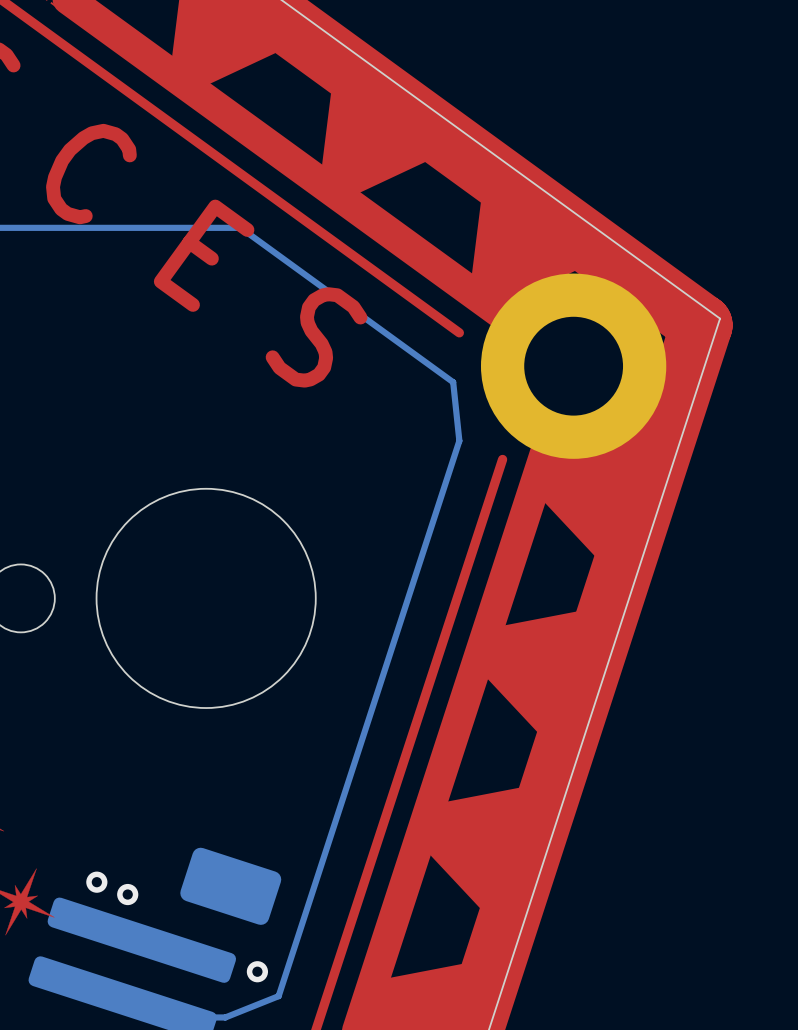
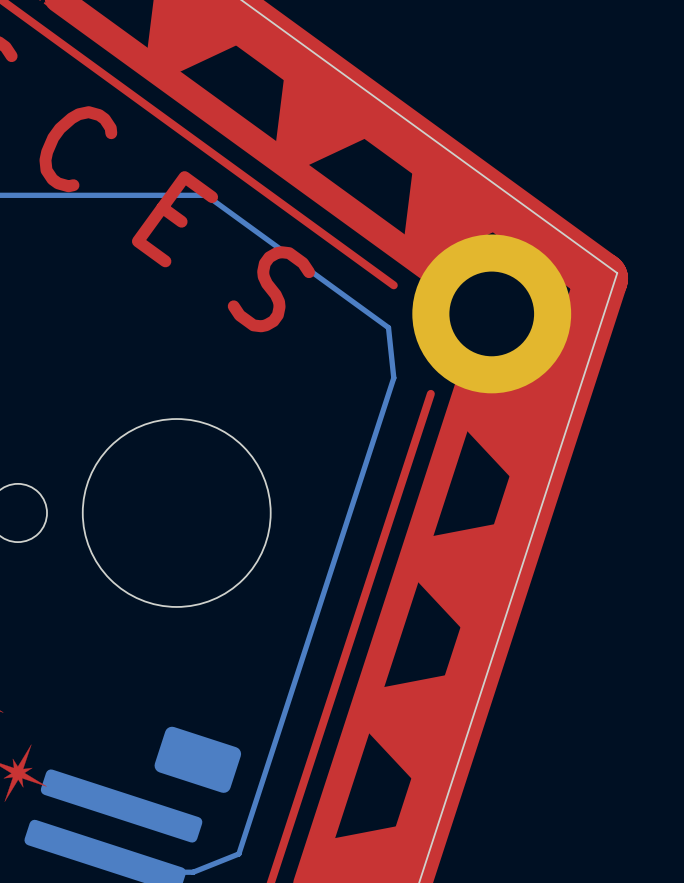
via: (96, 882) -> none
via: (127, 894) -> none
via: (257, 971) -> none

